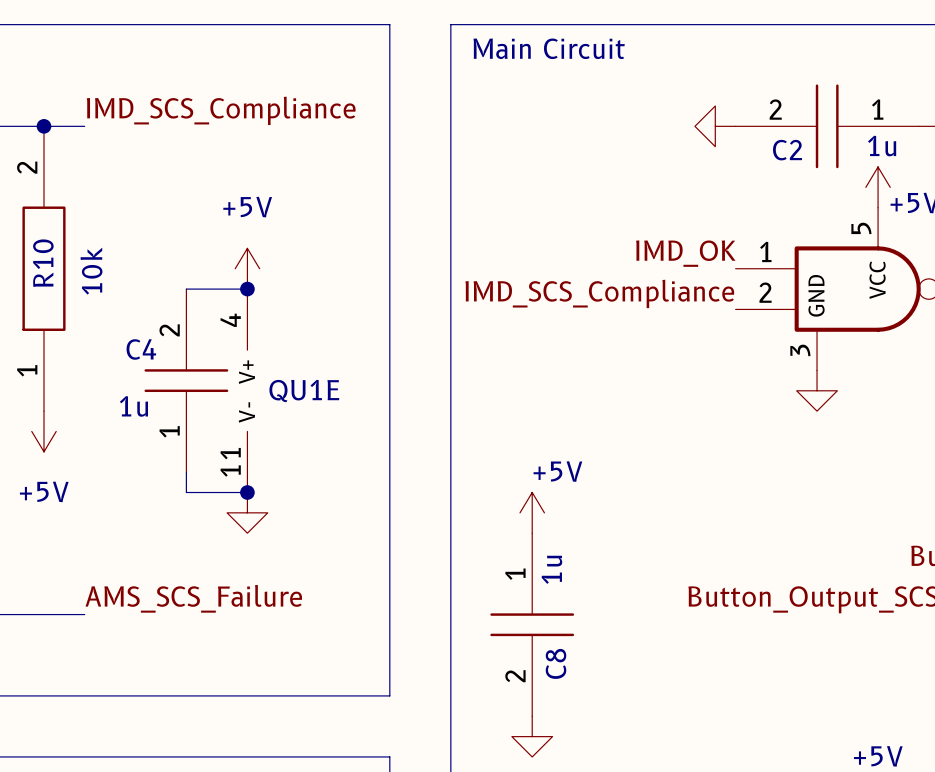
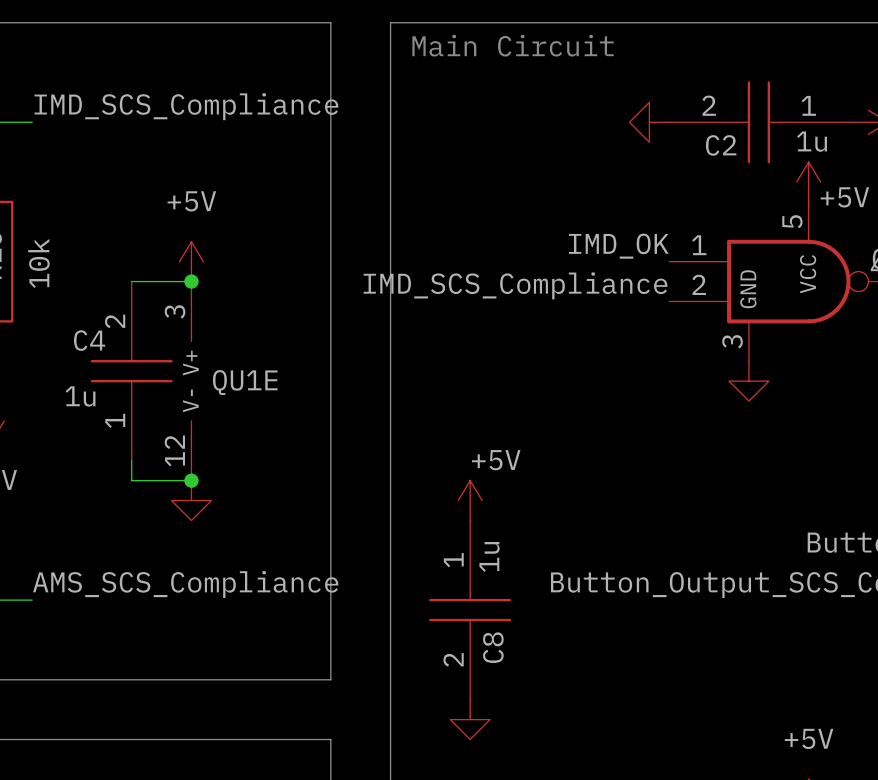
QU1E pin number: 4 (230, 320) -> 3 (175, 311)
QU1E pin number: 11 (230, 462) -> 12 (174, 450)
label: AMS_SCS_Failure (193, 598) -> AMS_SCS_Compliance (185, 584)

